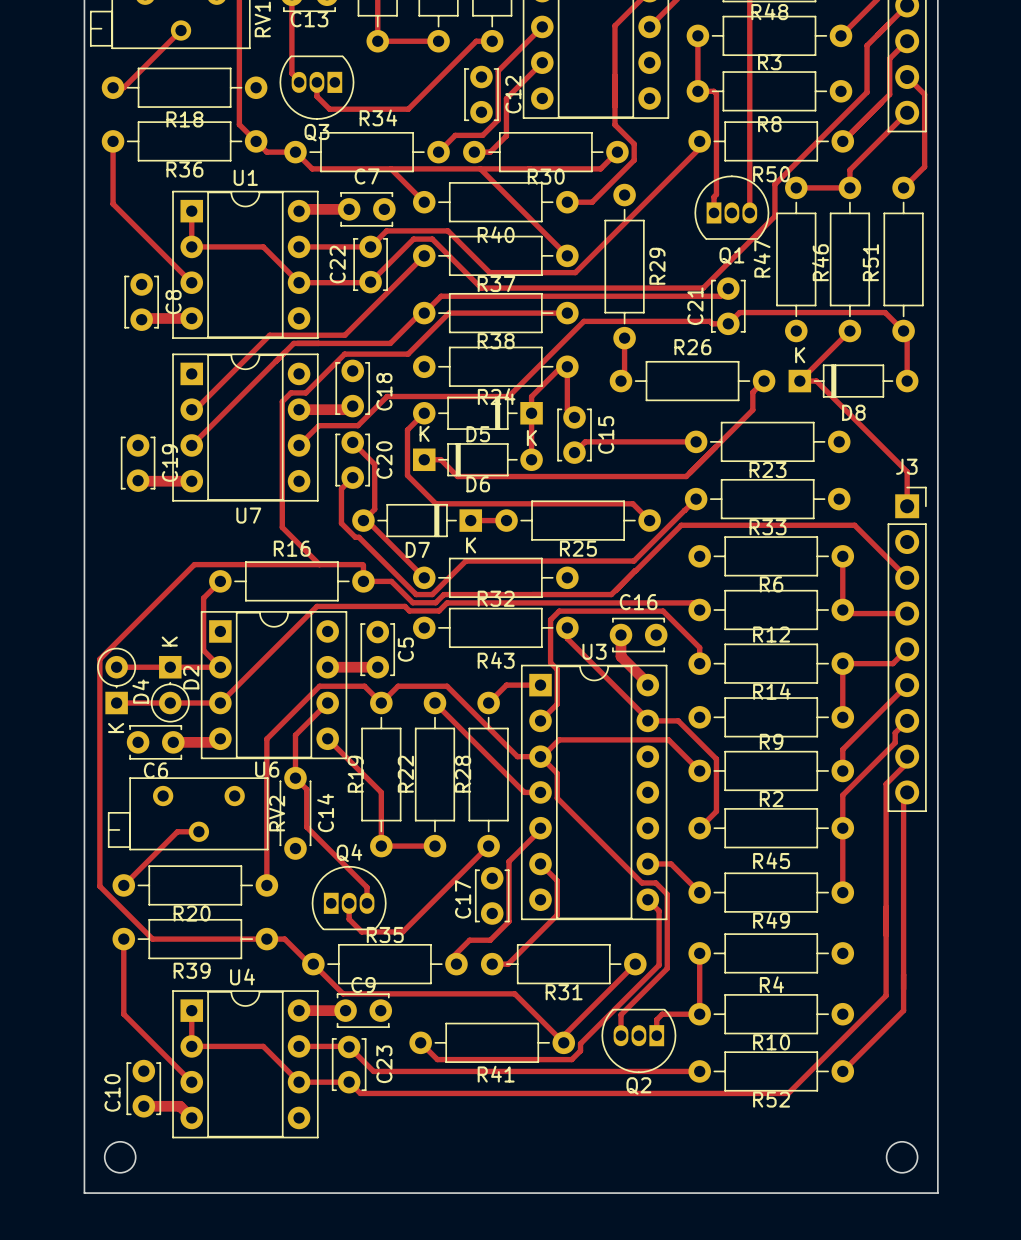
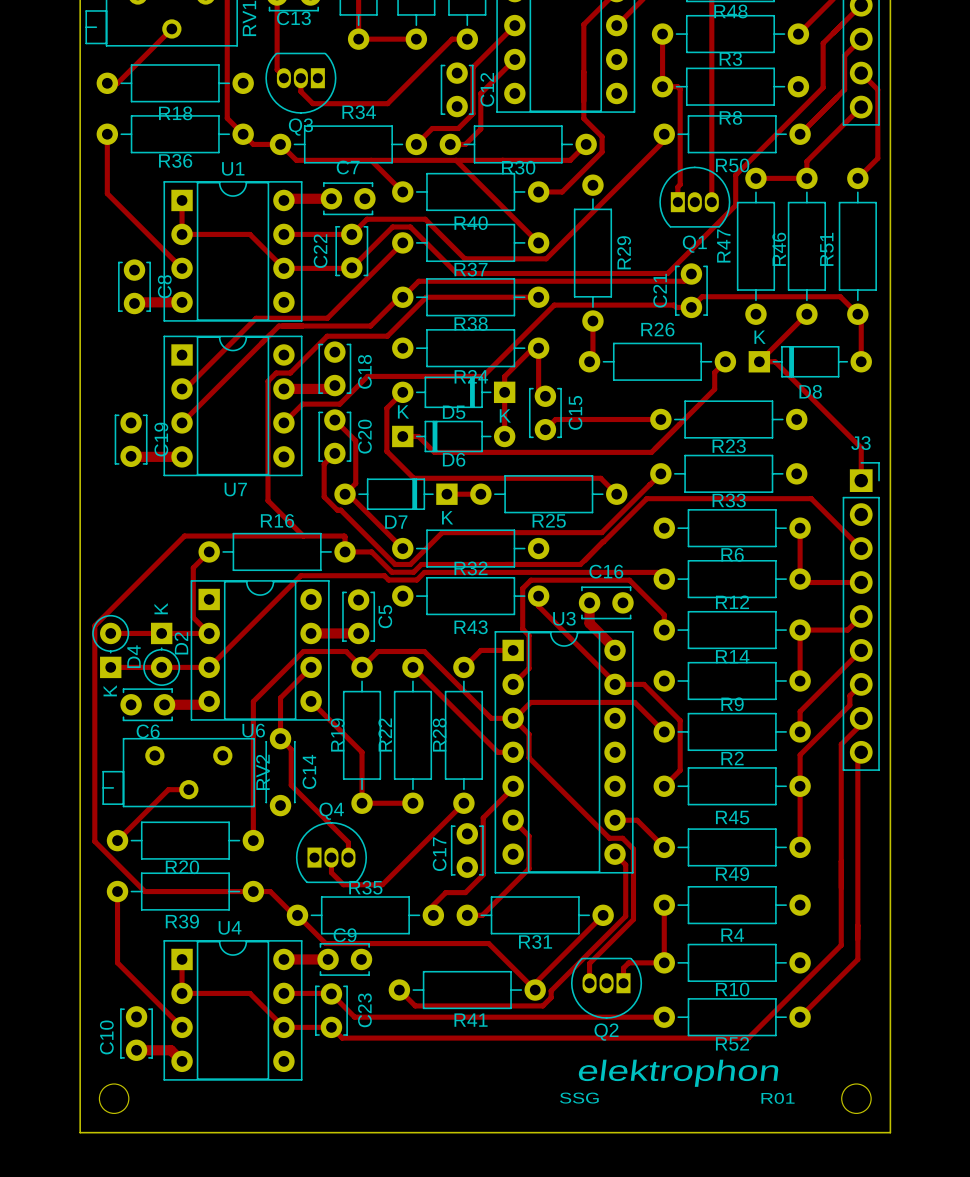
drawing: none -> [560, 1059, 795, 1104]

